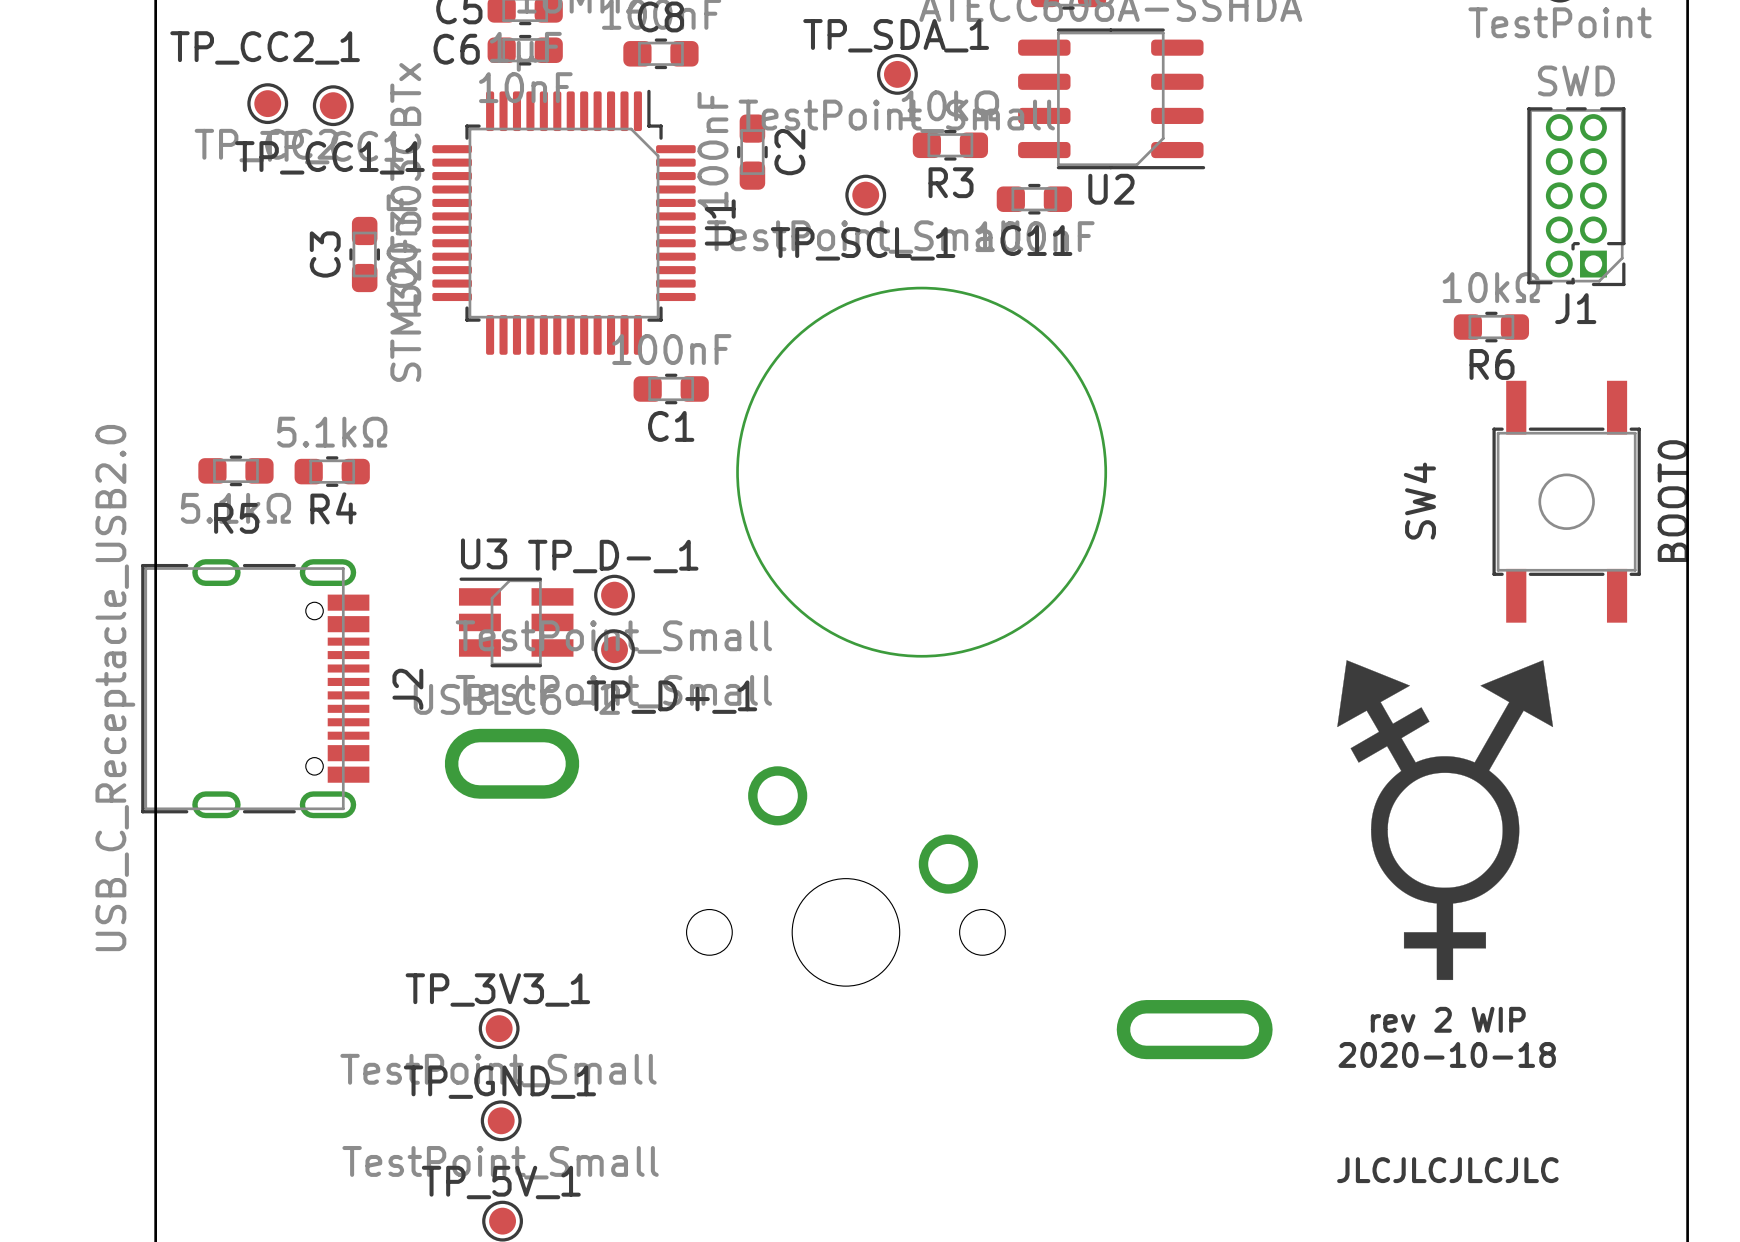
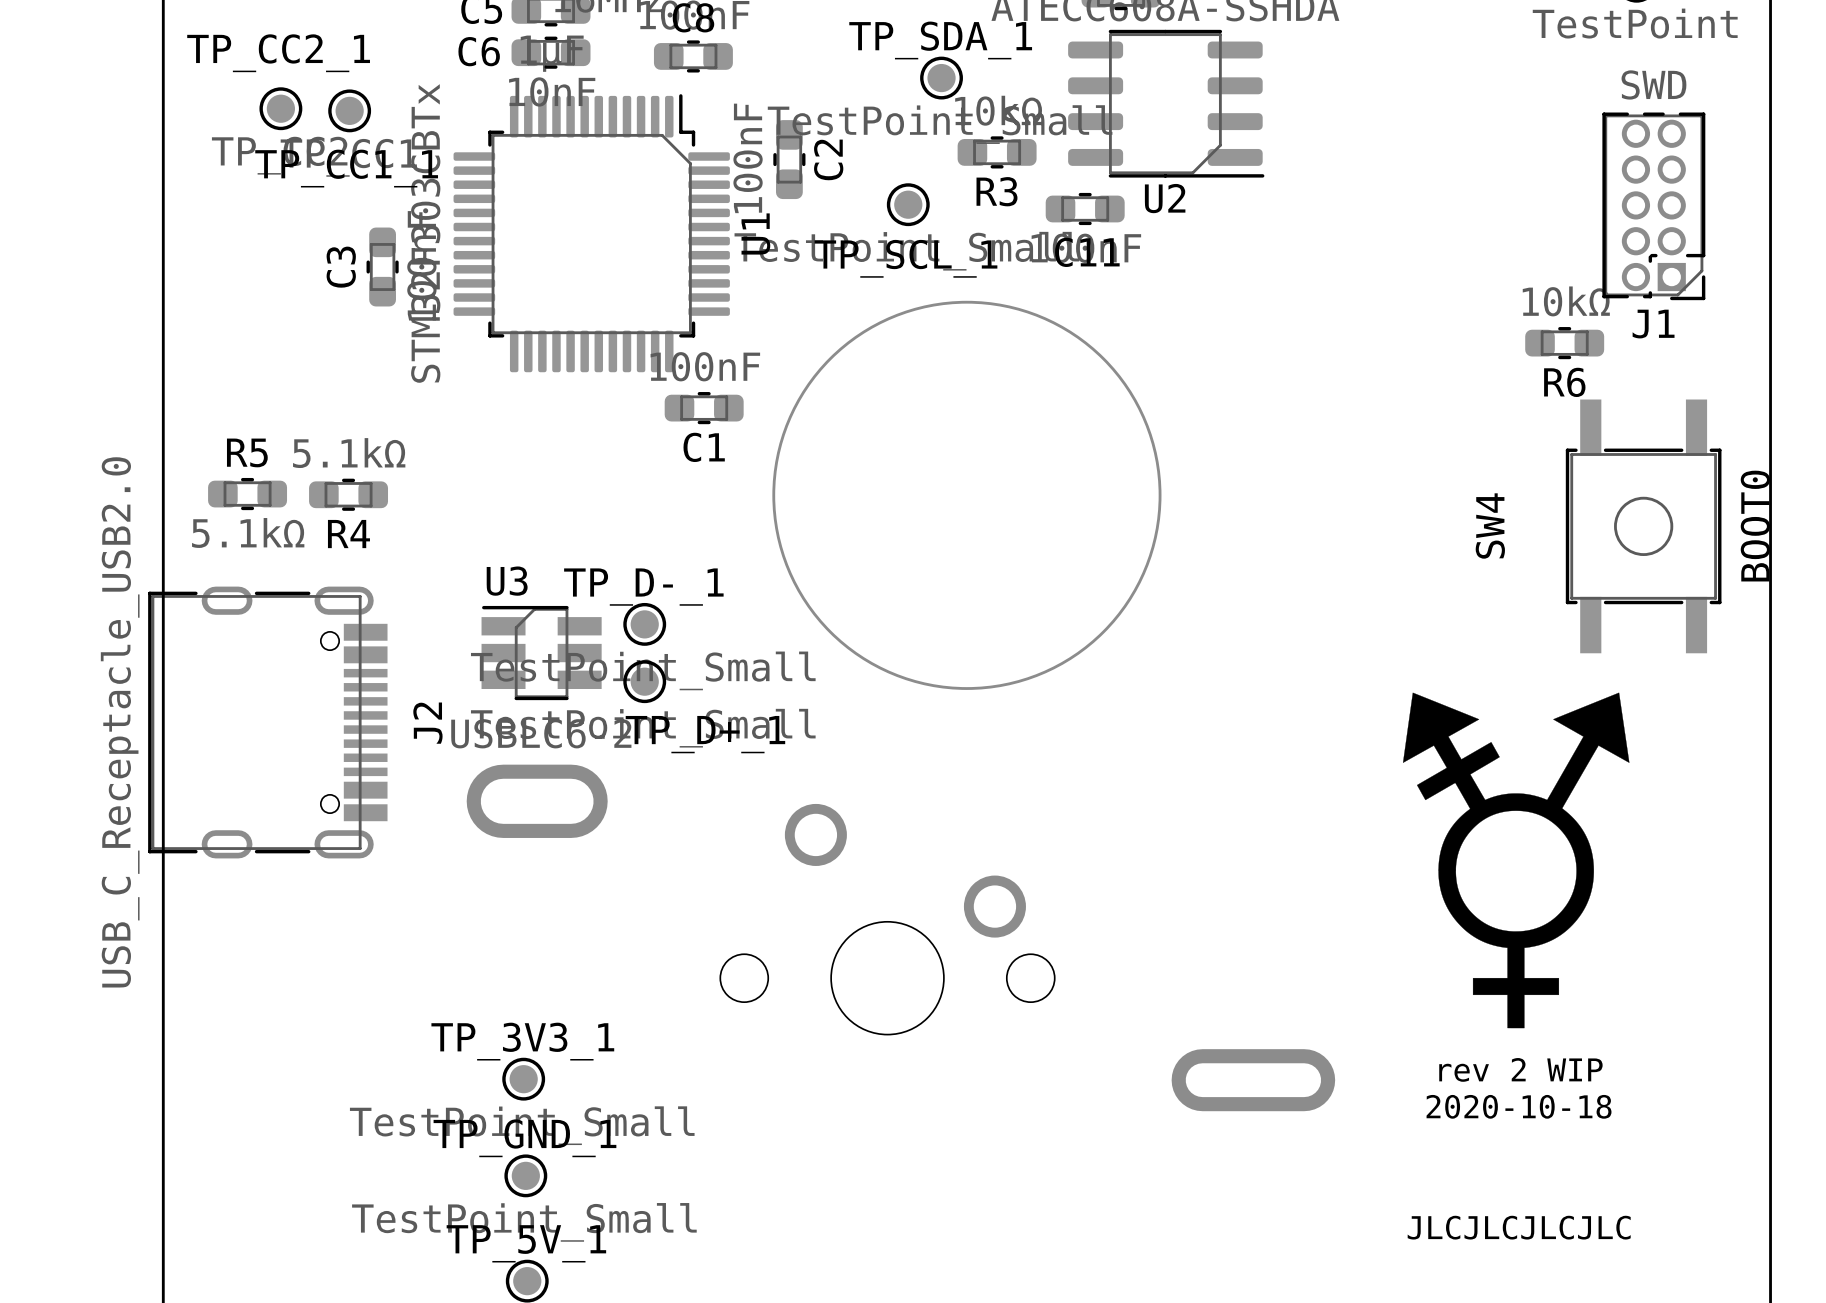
R5 name position: R5 (236, 518) -> R5 (247, 452)

